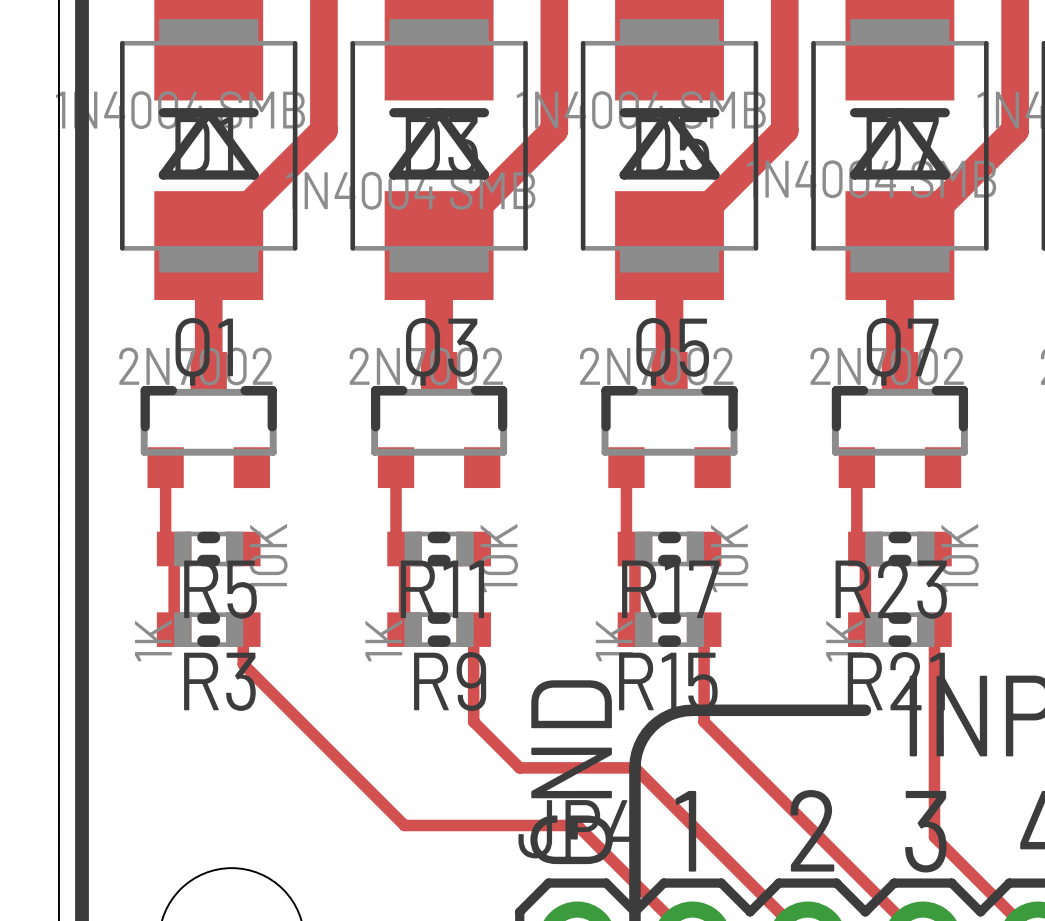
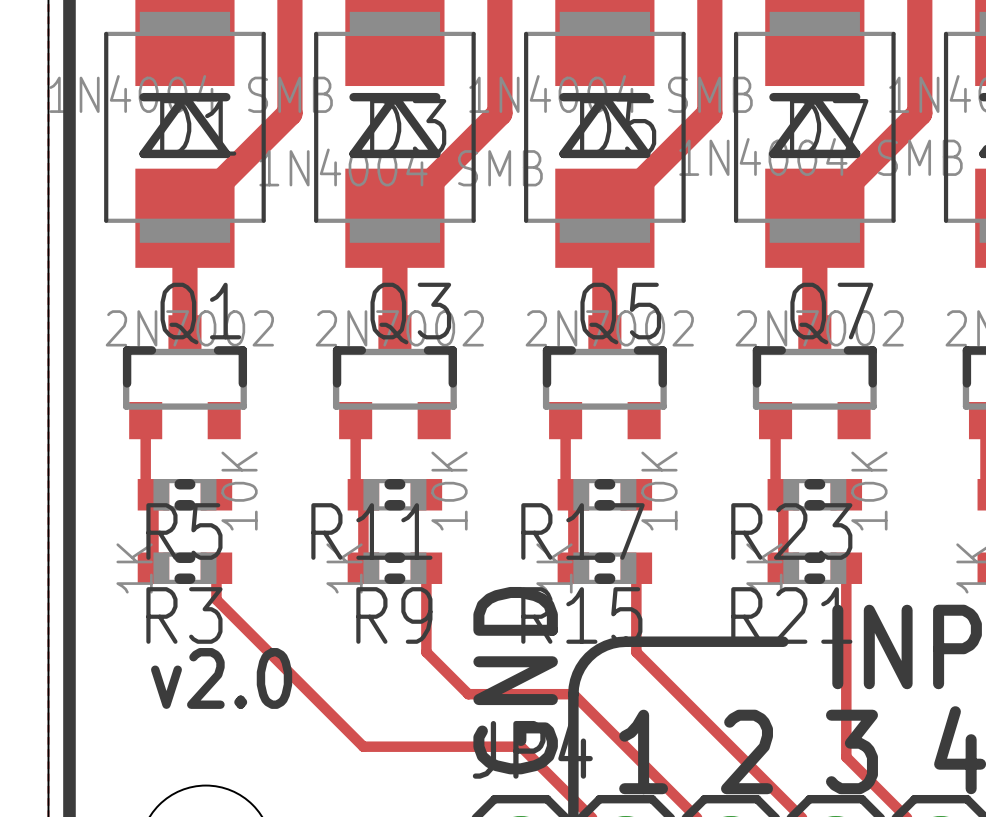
text: none -> v2.0 (221, 678)

